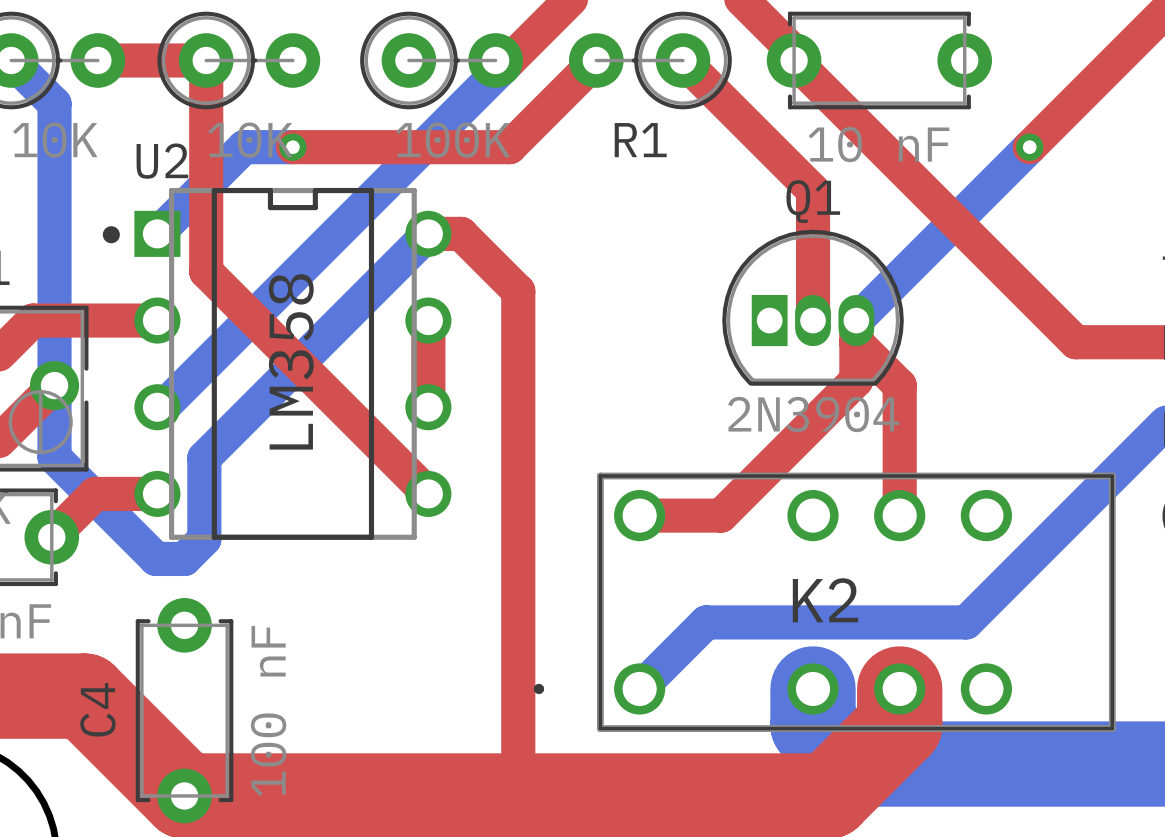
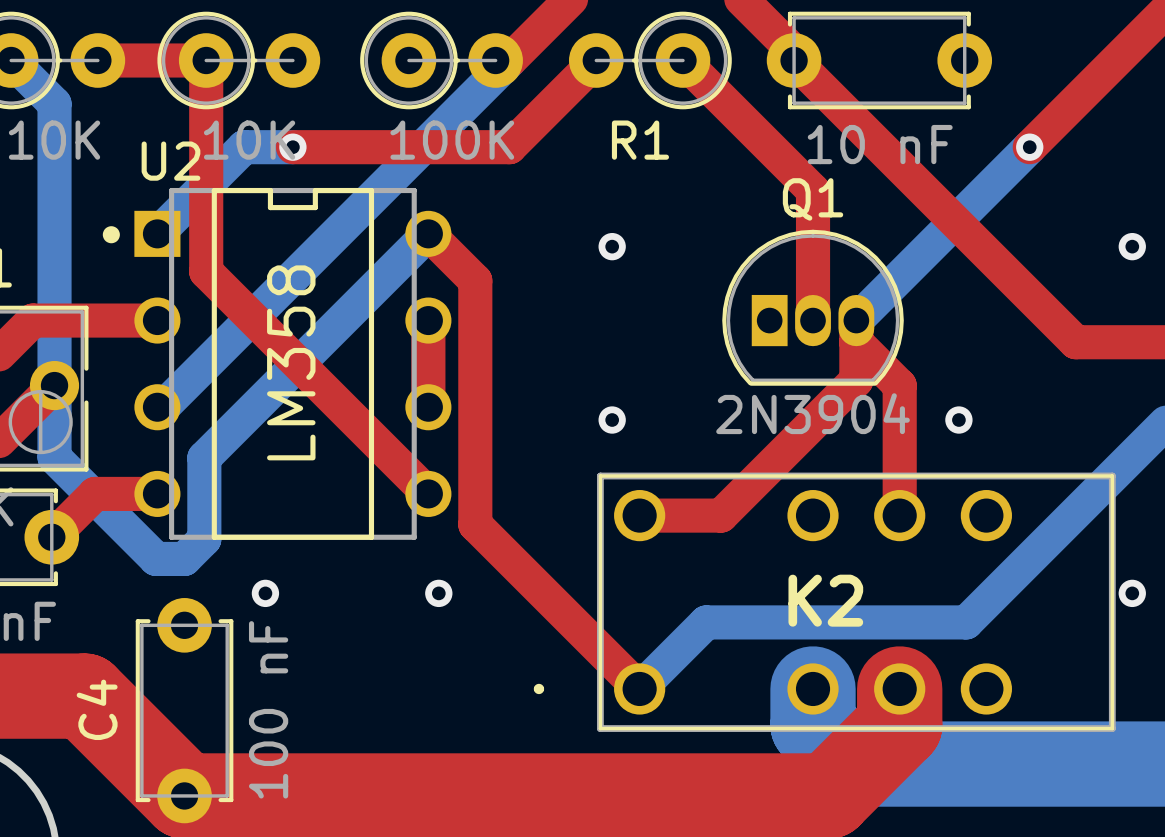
top track: (428, 233) (460, 233) (518, 291) (518, 795) -> (428, 233) (475, 280) (475, 524) (639, 688)
via: none -> (612, 246)
via: none -> (1132, 246)
via: none -> (612, 420)
via: none -> (958, 420)
via: none -> (265, 593)
via: none -> (438, 593)
via: none -> (1132, 593)

